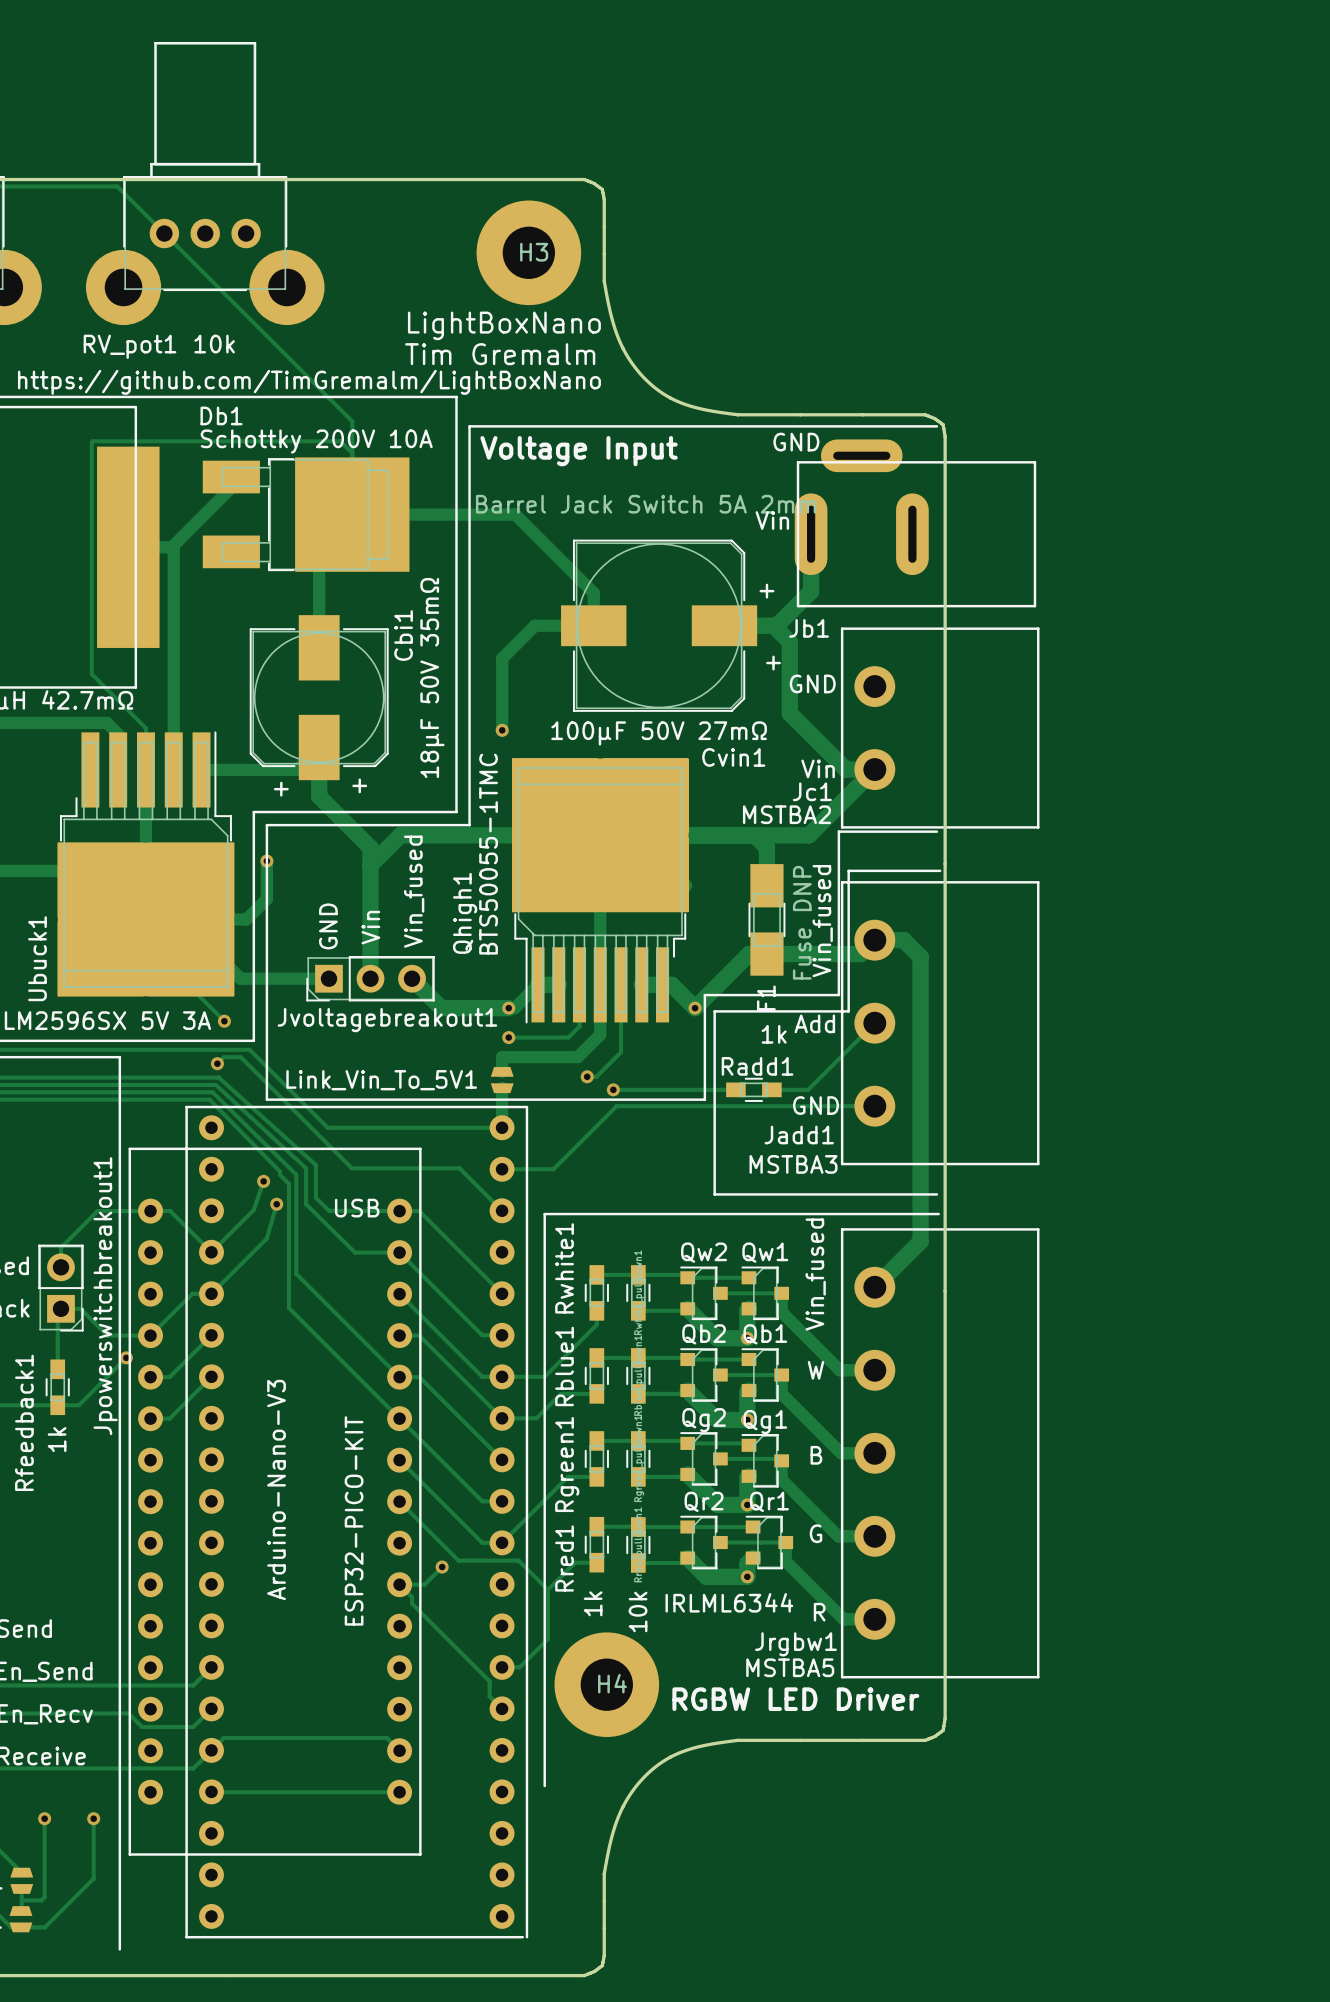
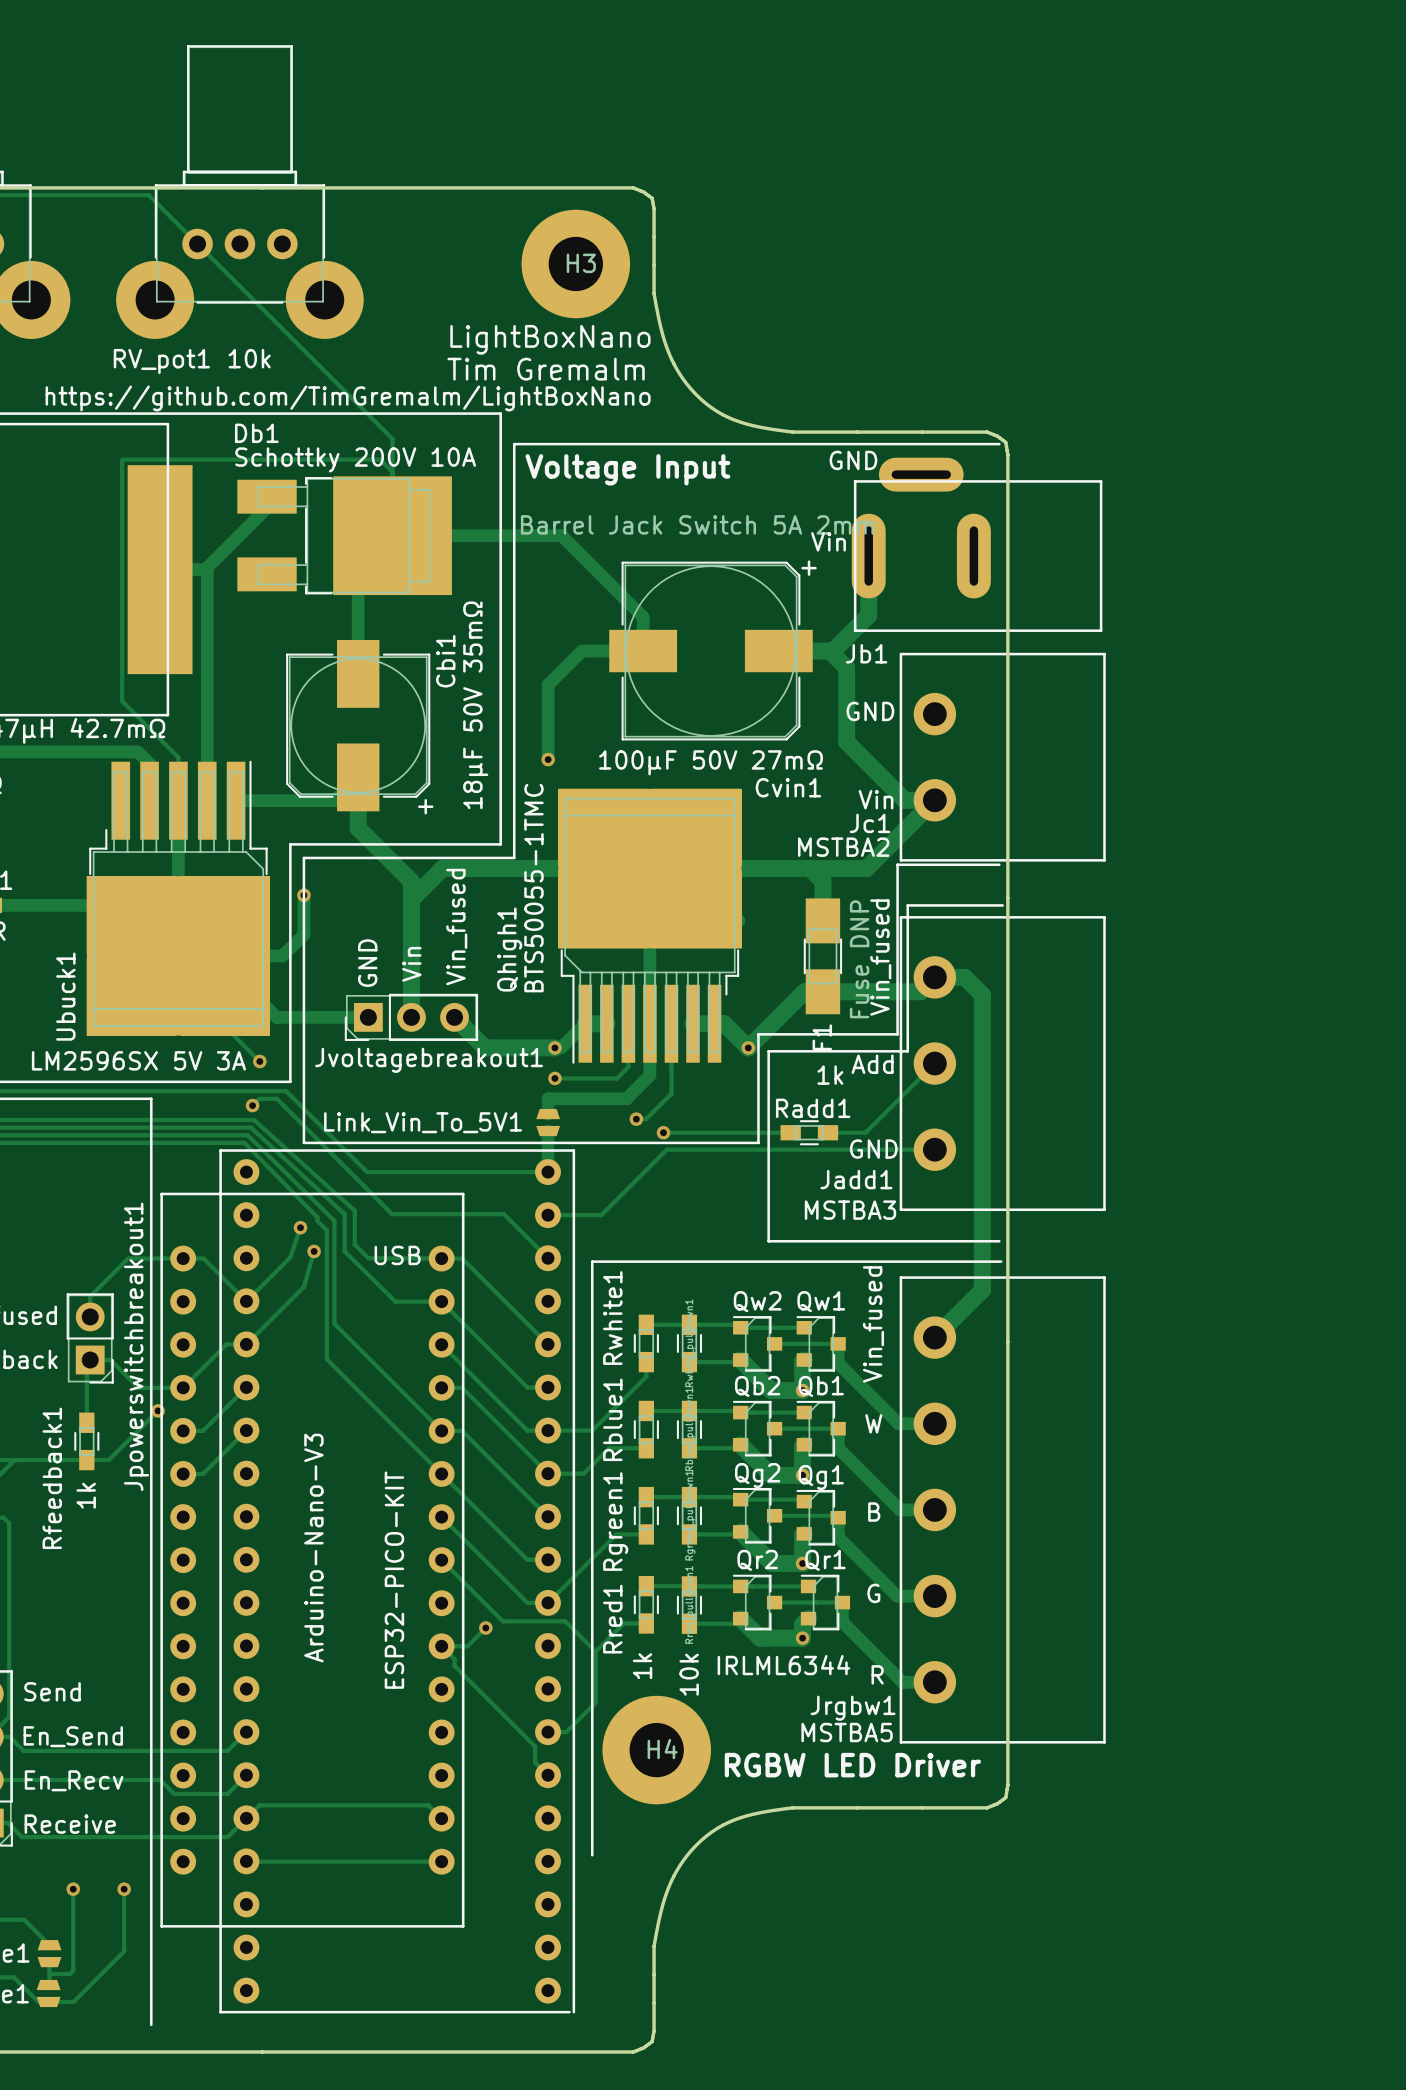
Cvin1 text position: + (766, 591) -> + (809, 568)
Cvin1 text: + (773, 663) -> none
Cbi1 text: + (359, 785) -> none
Cbi1 text position: + (281, 789) -> + (425, 806)

